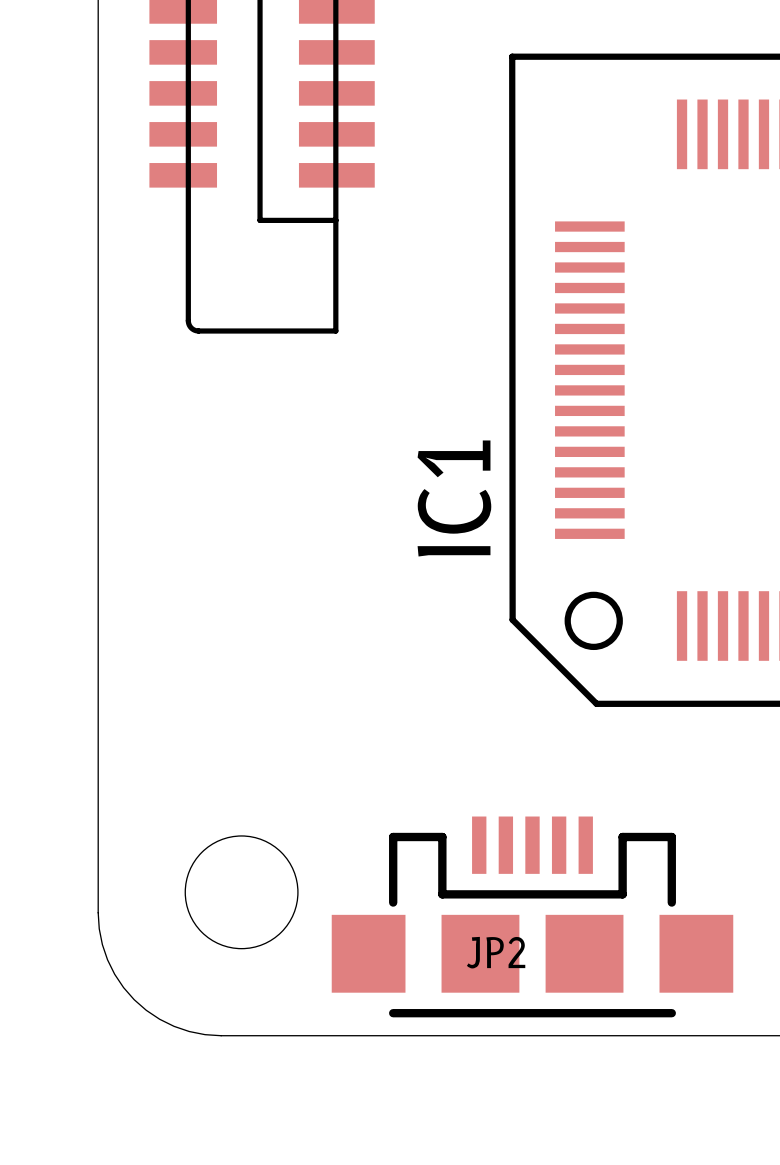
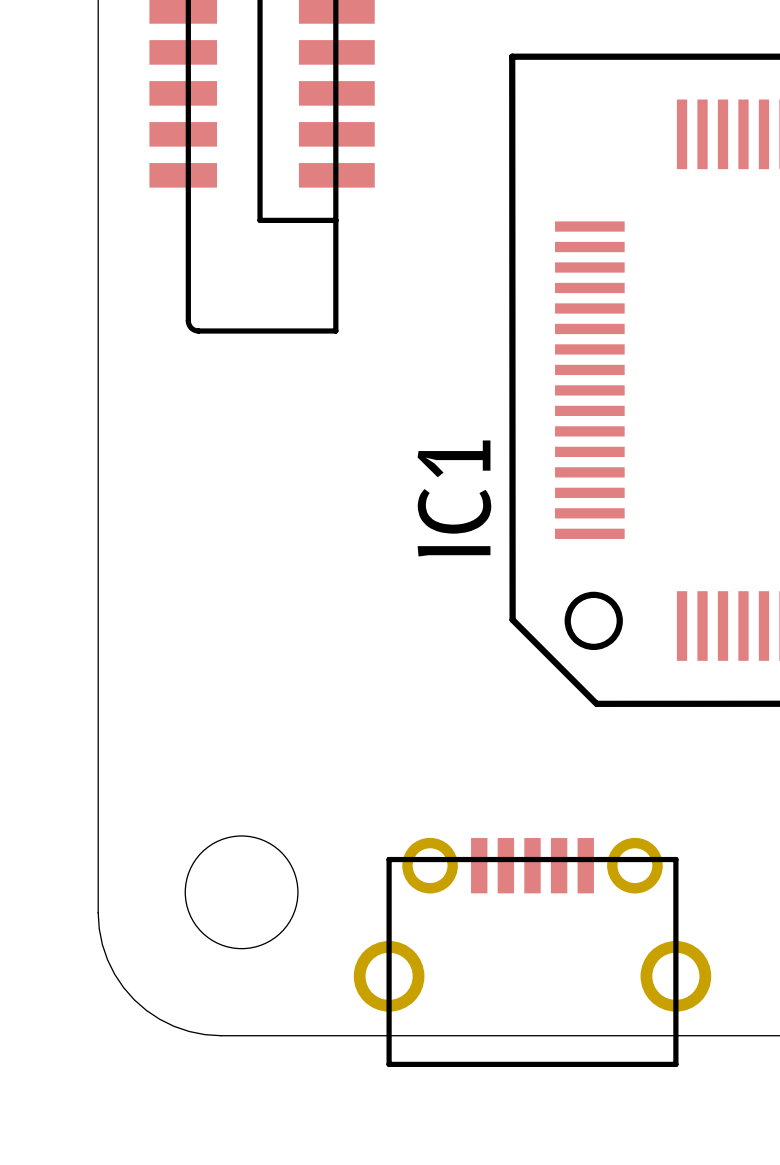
JP2: (532, 916) -> none
part: none -> (532, 952)

